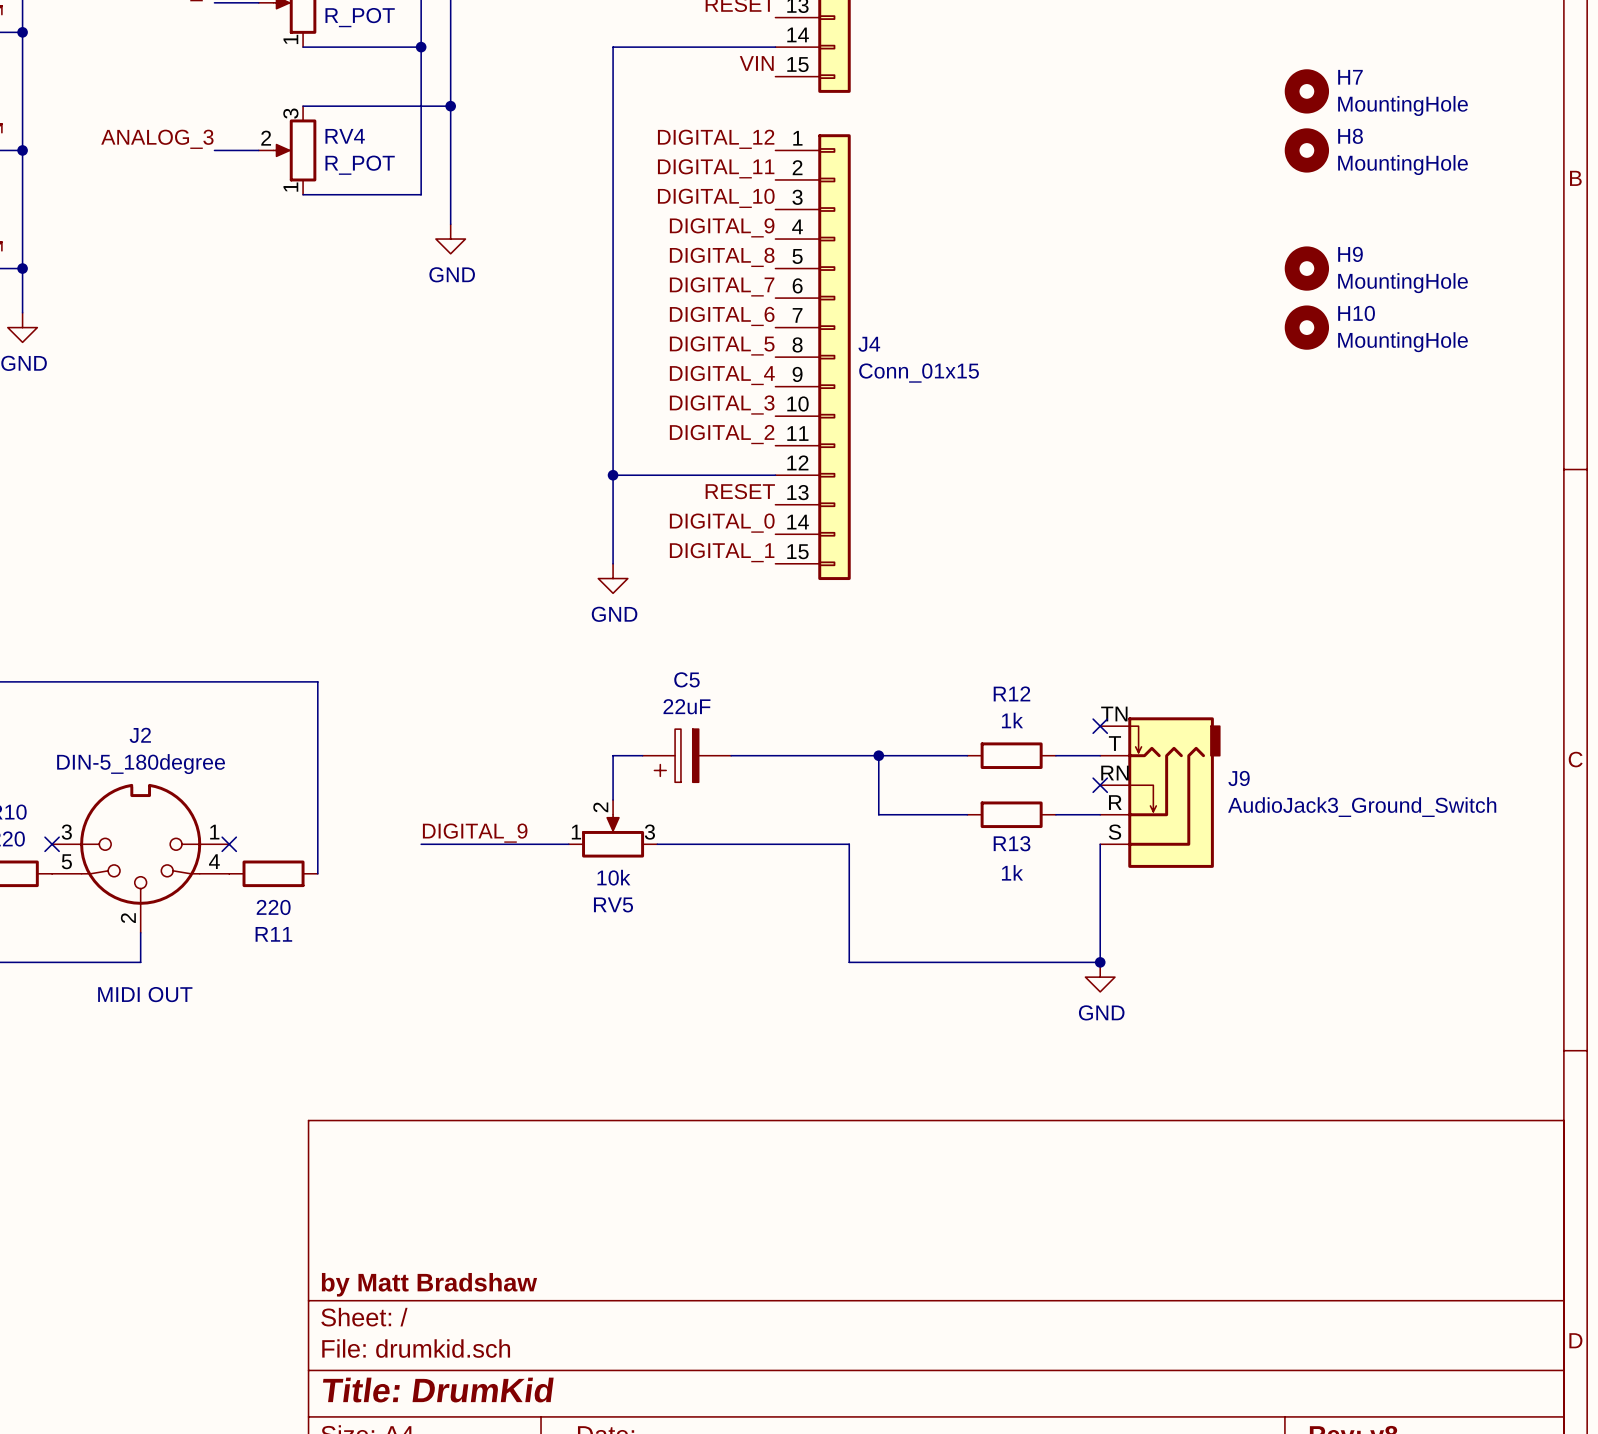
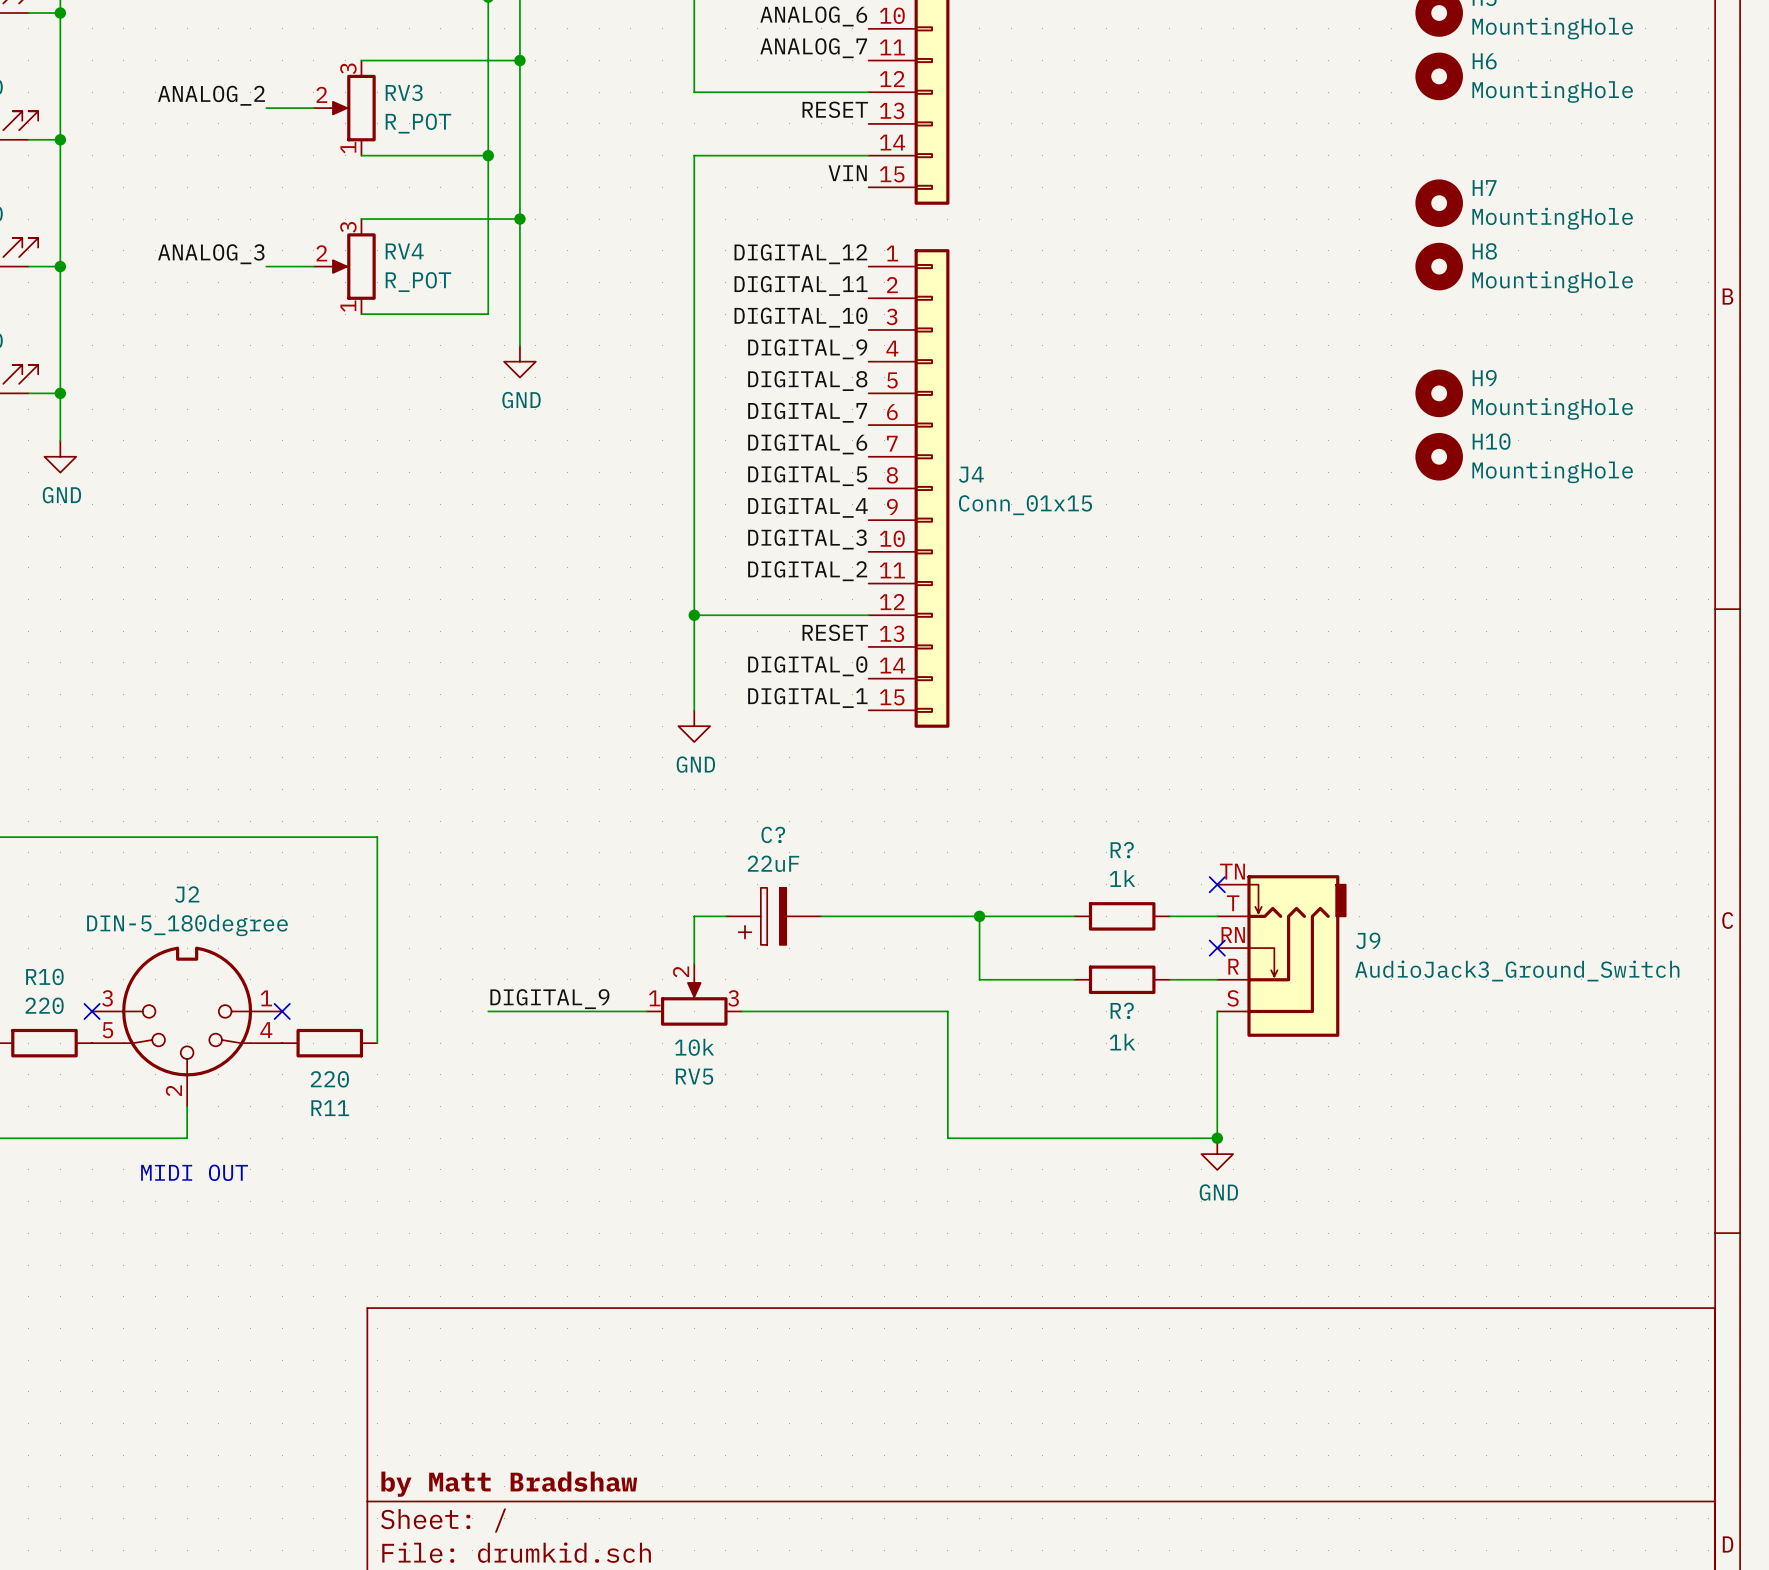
C5 name: C5 (686, 679) -> C? (773, 834)
R12 name: R12 (1011, 693) -> R? (1122, 850)
R13 name: R13 (1012, 843) -> R? (1122, 1010)

